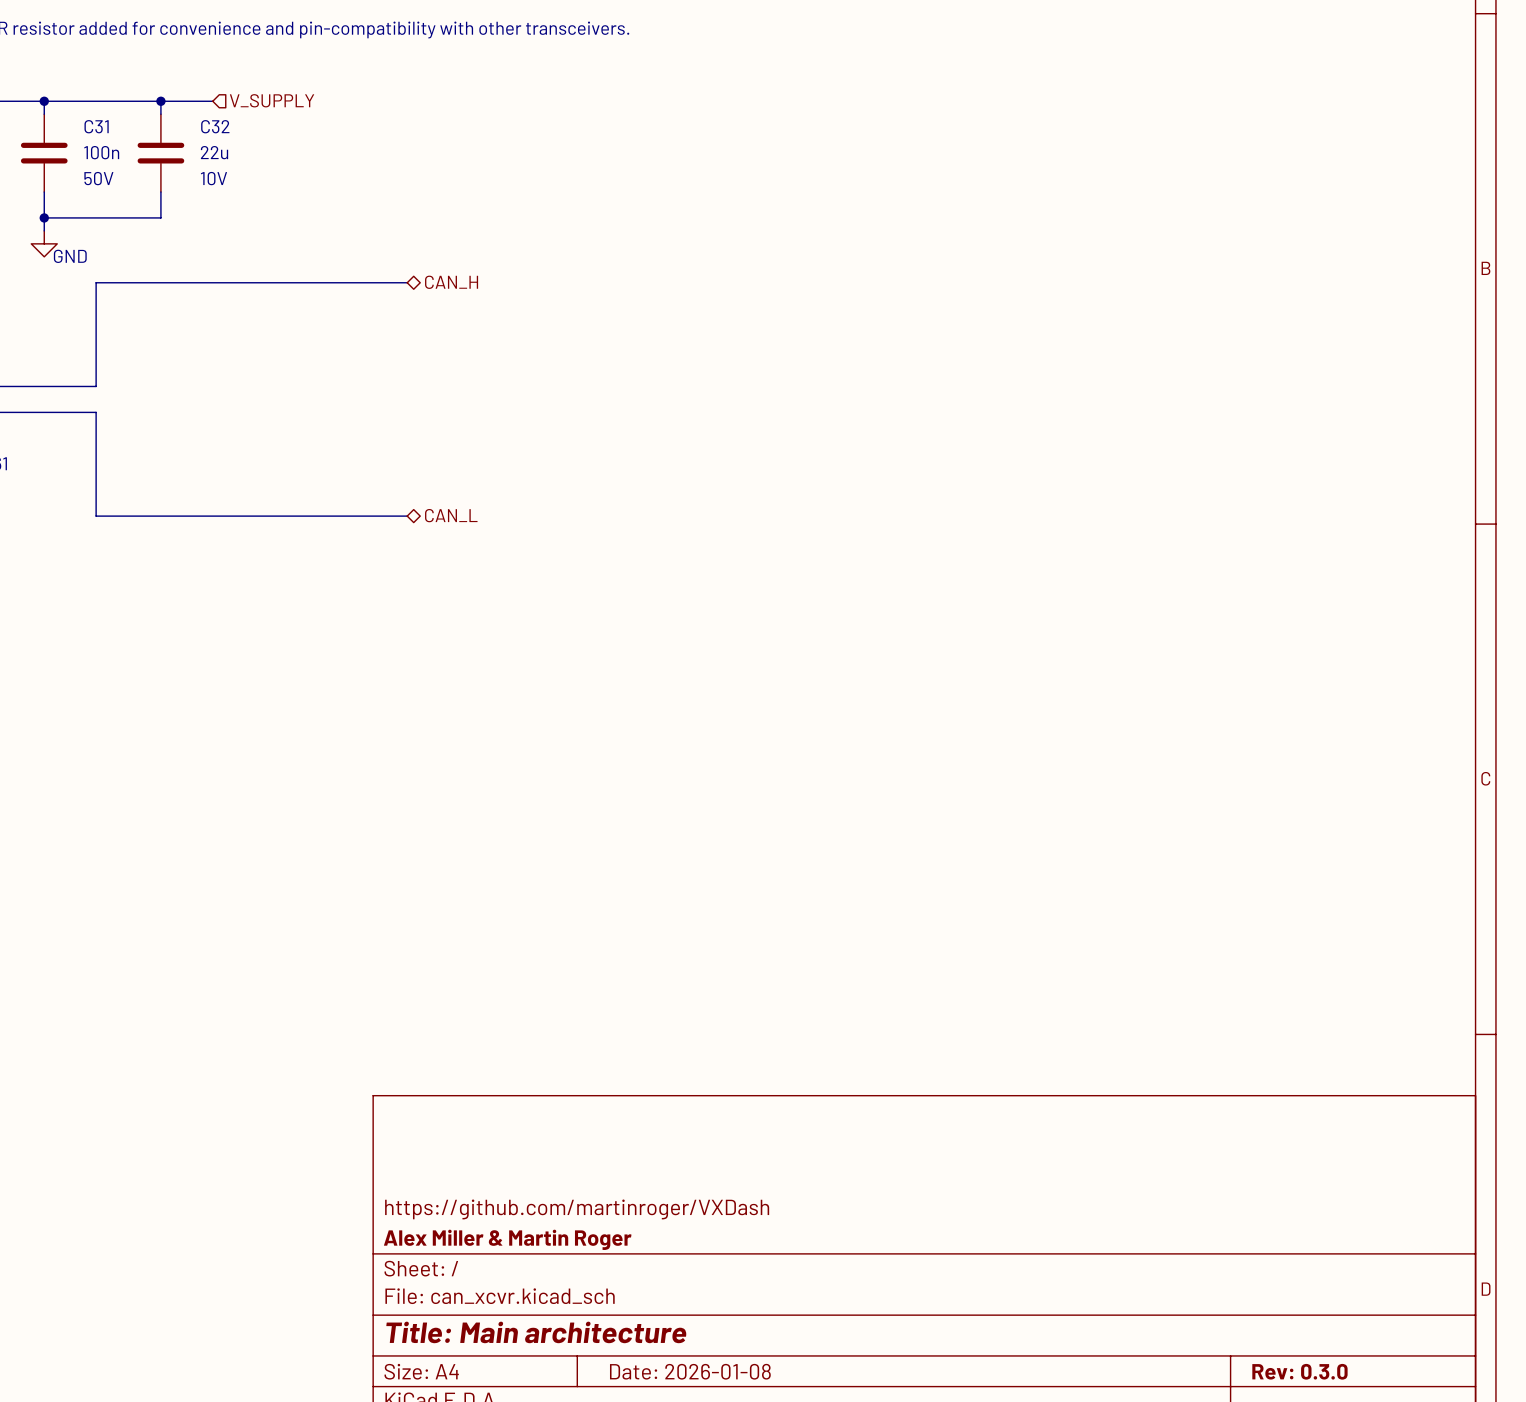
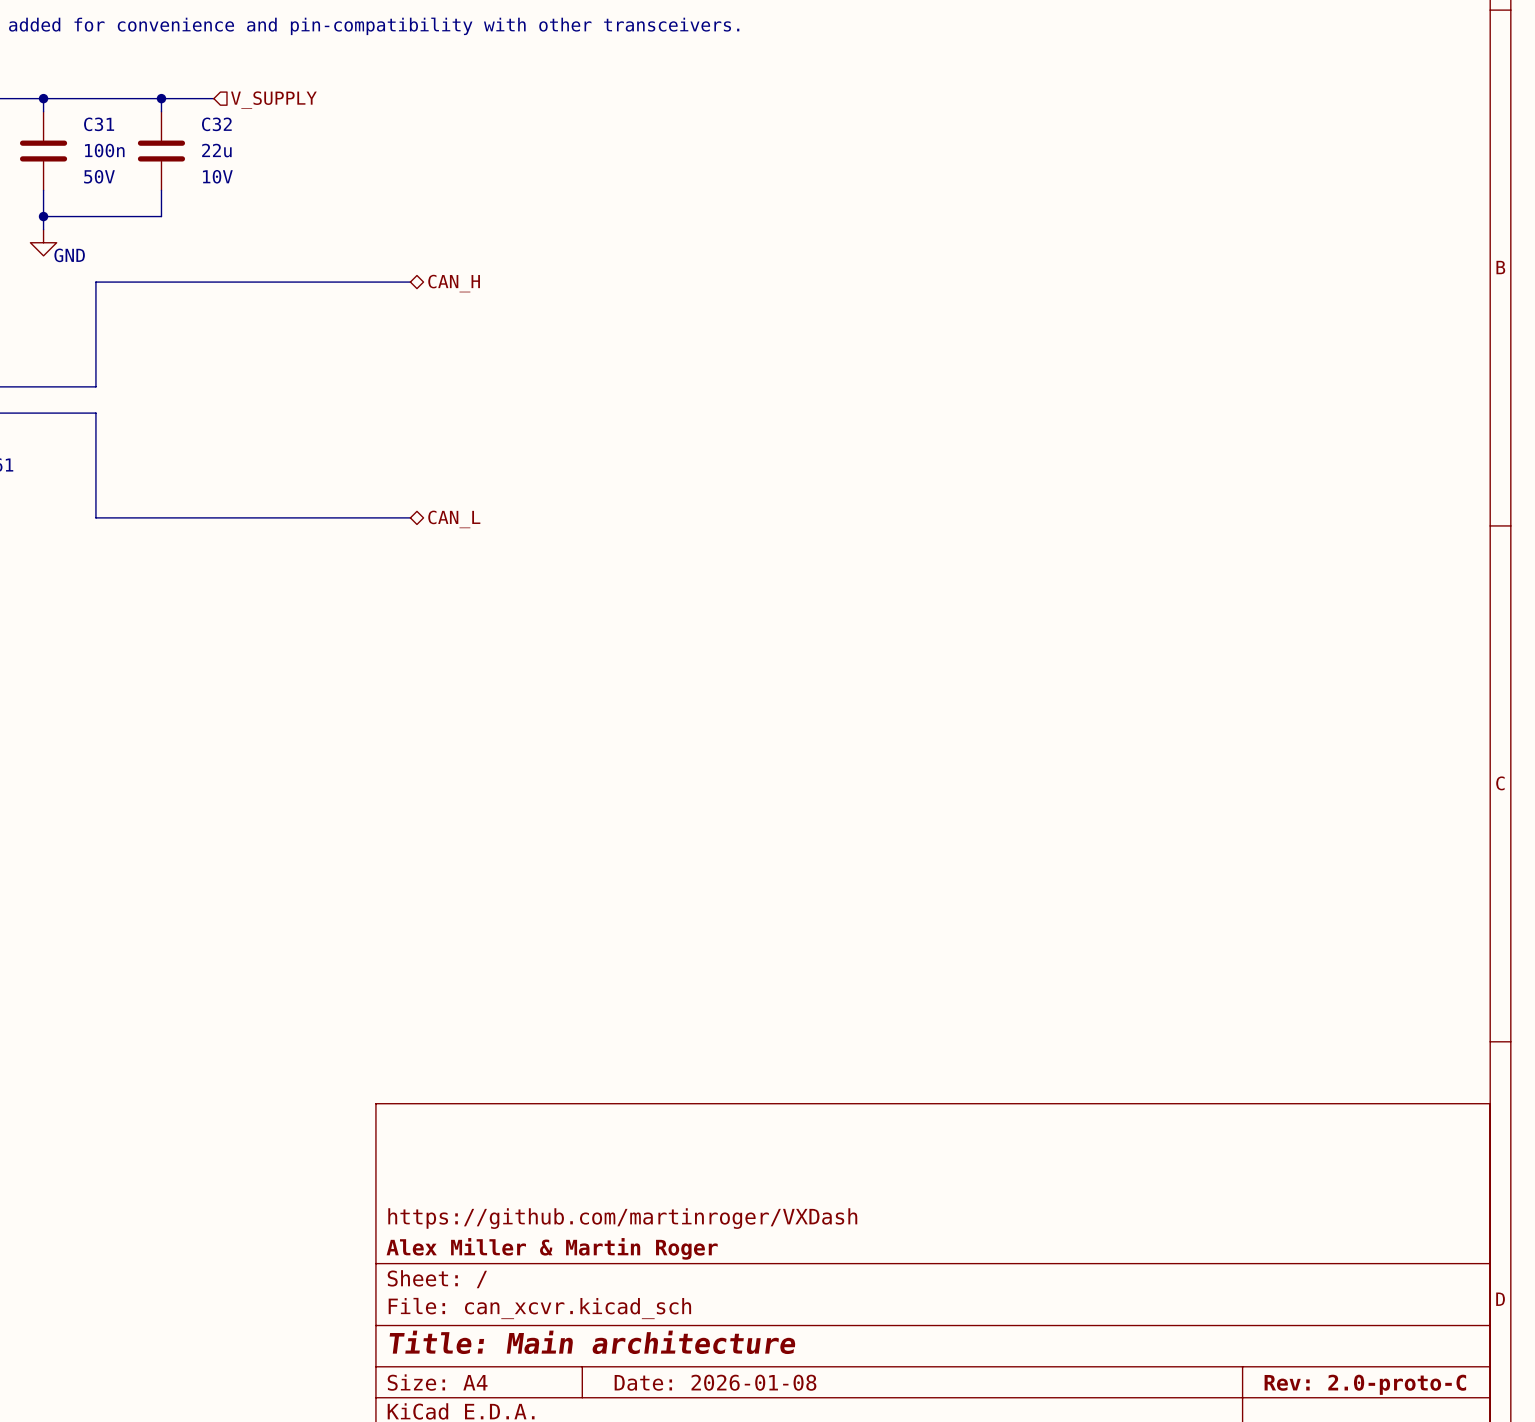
title block: Rev: 0.3.0 (1299, 1371) -> Rev: 2.0-proto-C (1365, 1384)

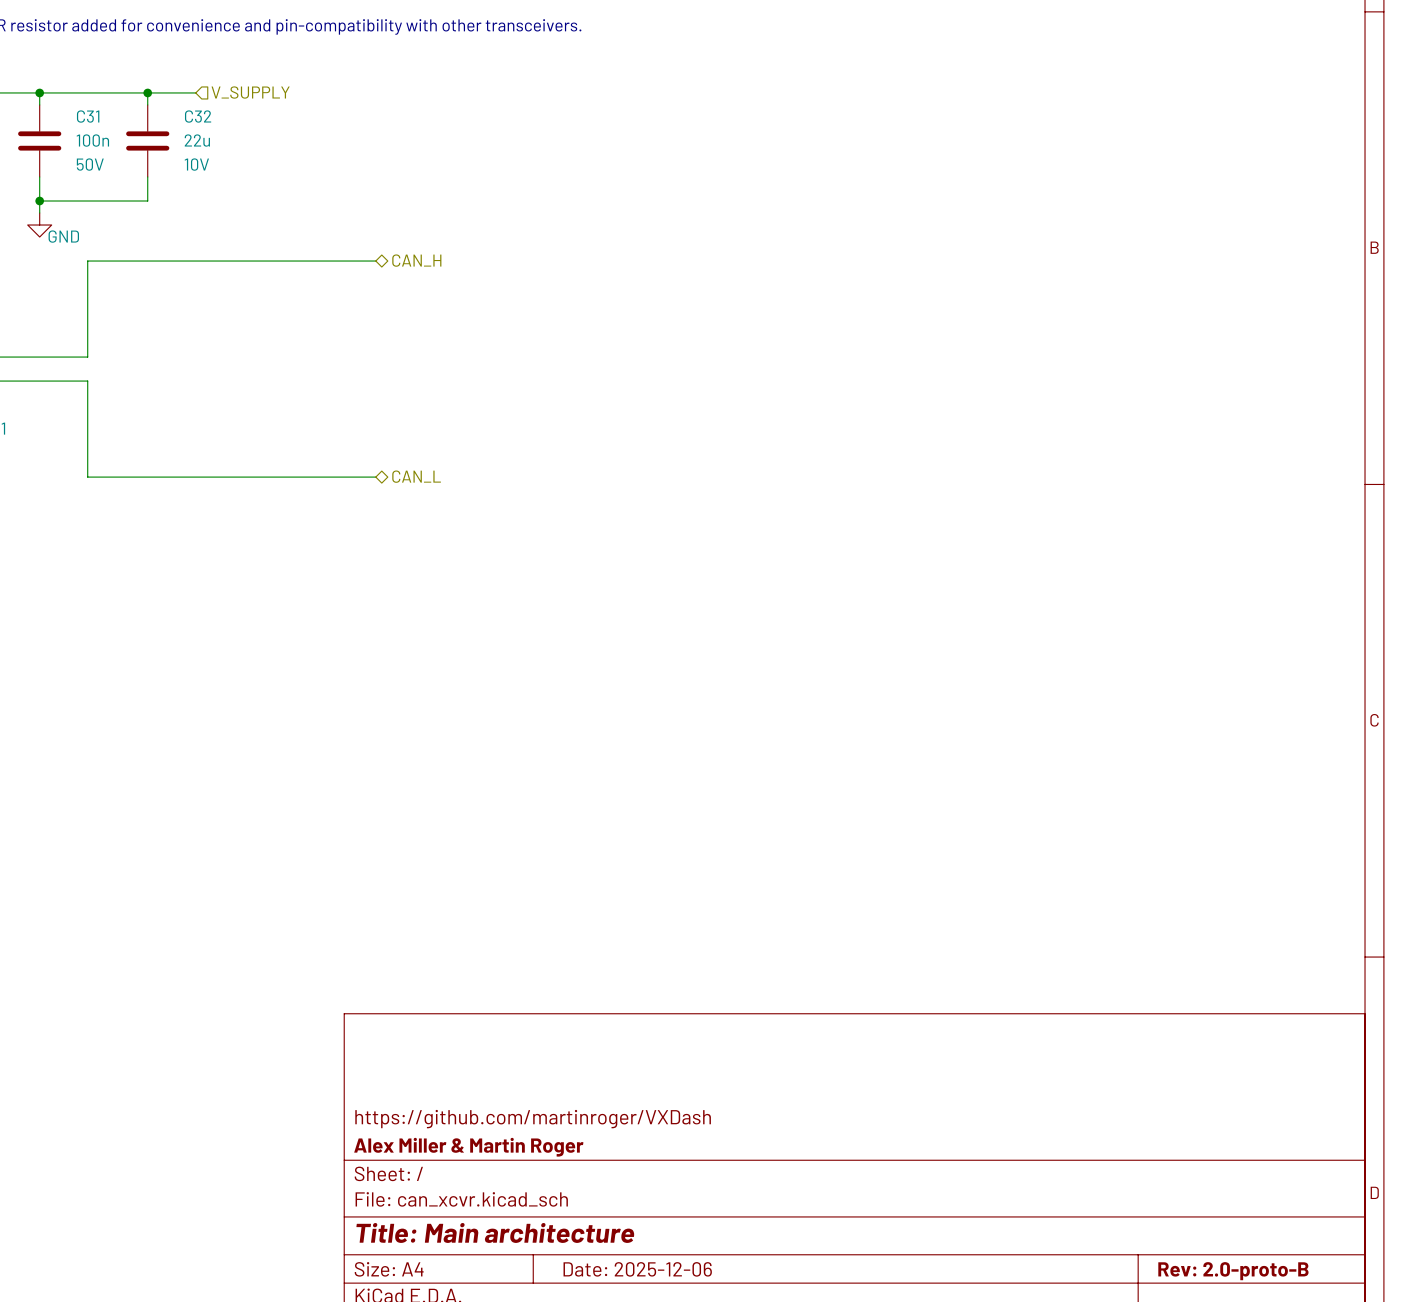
title block: Date: 2026-01-08 (715, 1382) -> Date: 2025-12-06 (637, 1269)
title block: Rev: 2.0-proto-C (1365, 1384) -> Rev: 2.0-proto-B (1233, 1271)

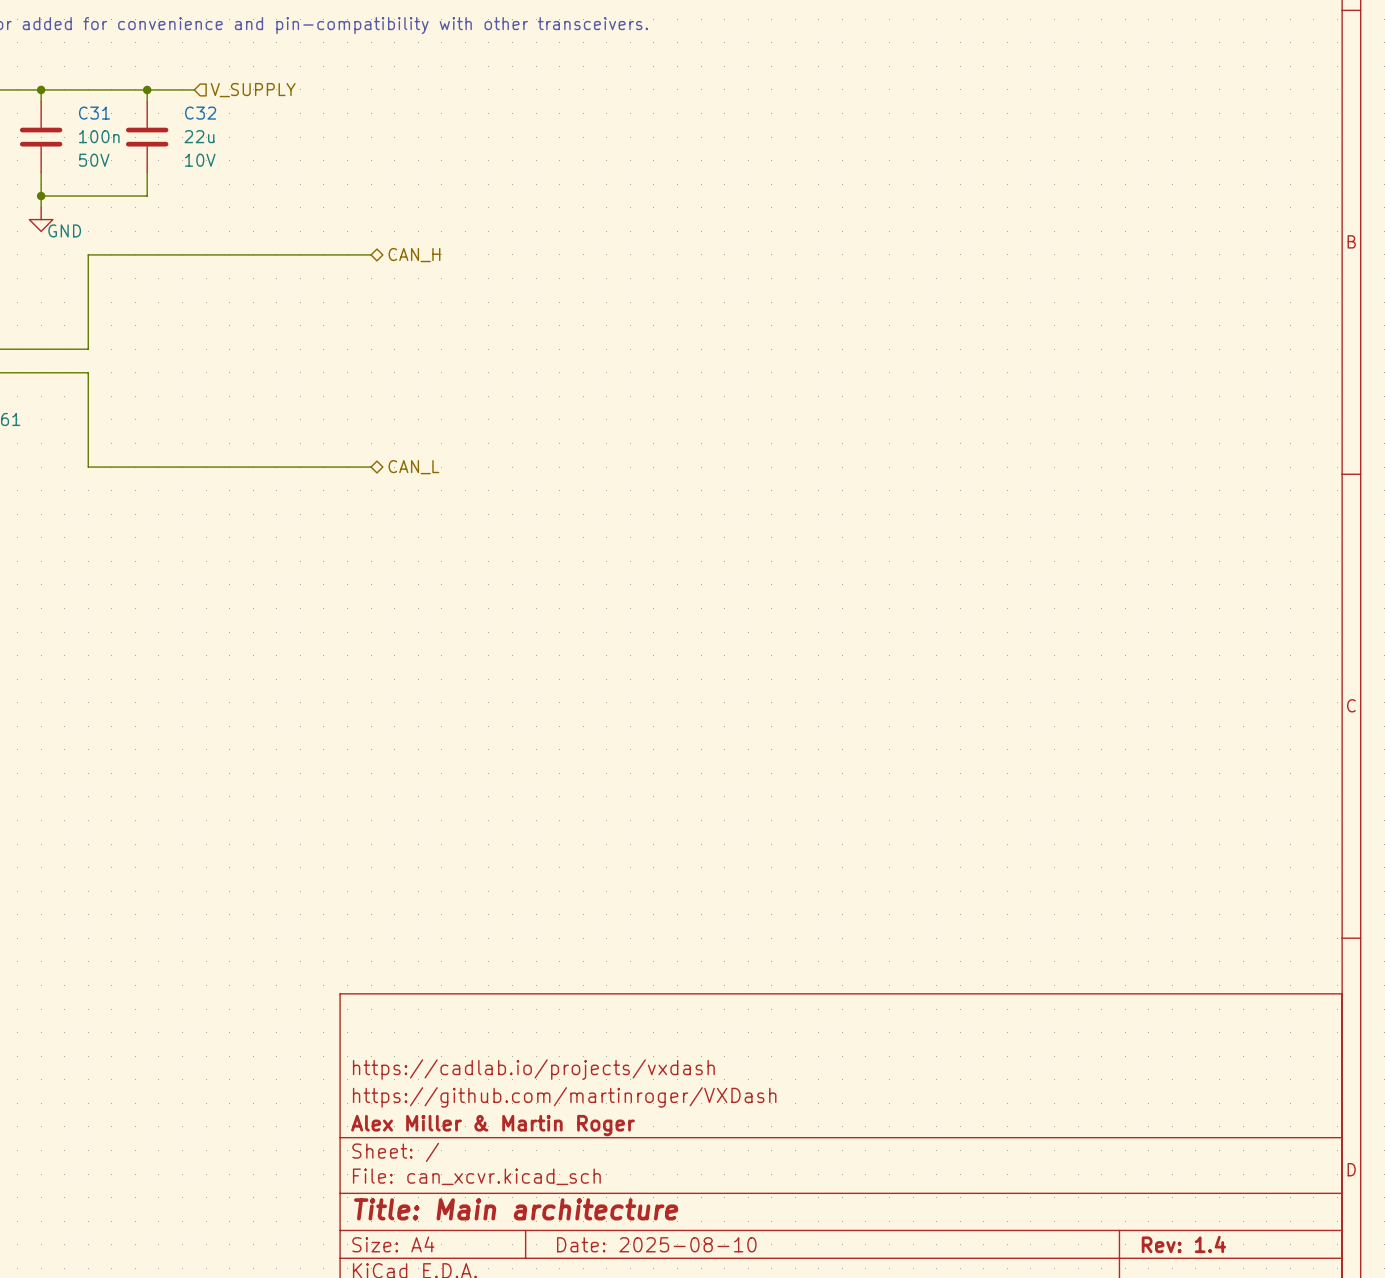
title block: none -> https://cadlab.io/projects/vxdash (533, 1069)
title block: Date: 2025-12-06 (637, 1269) -> Date: 2025-08-10 (656, 1244)
title block: Rev: 2.0-proto-B (1233, 1271) -> Rev: 1.4 (1183, 1244)

